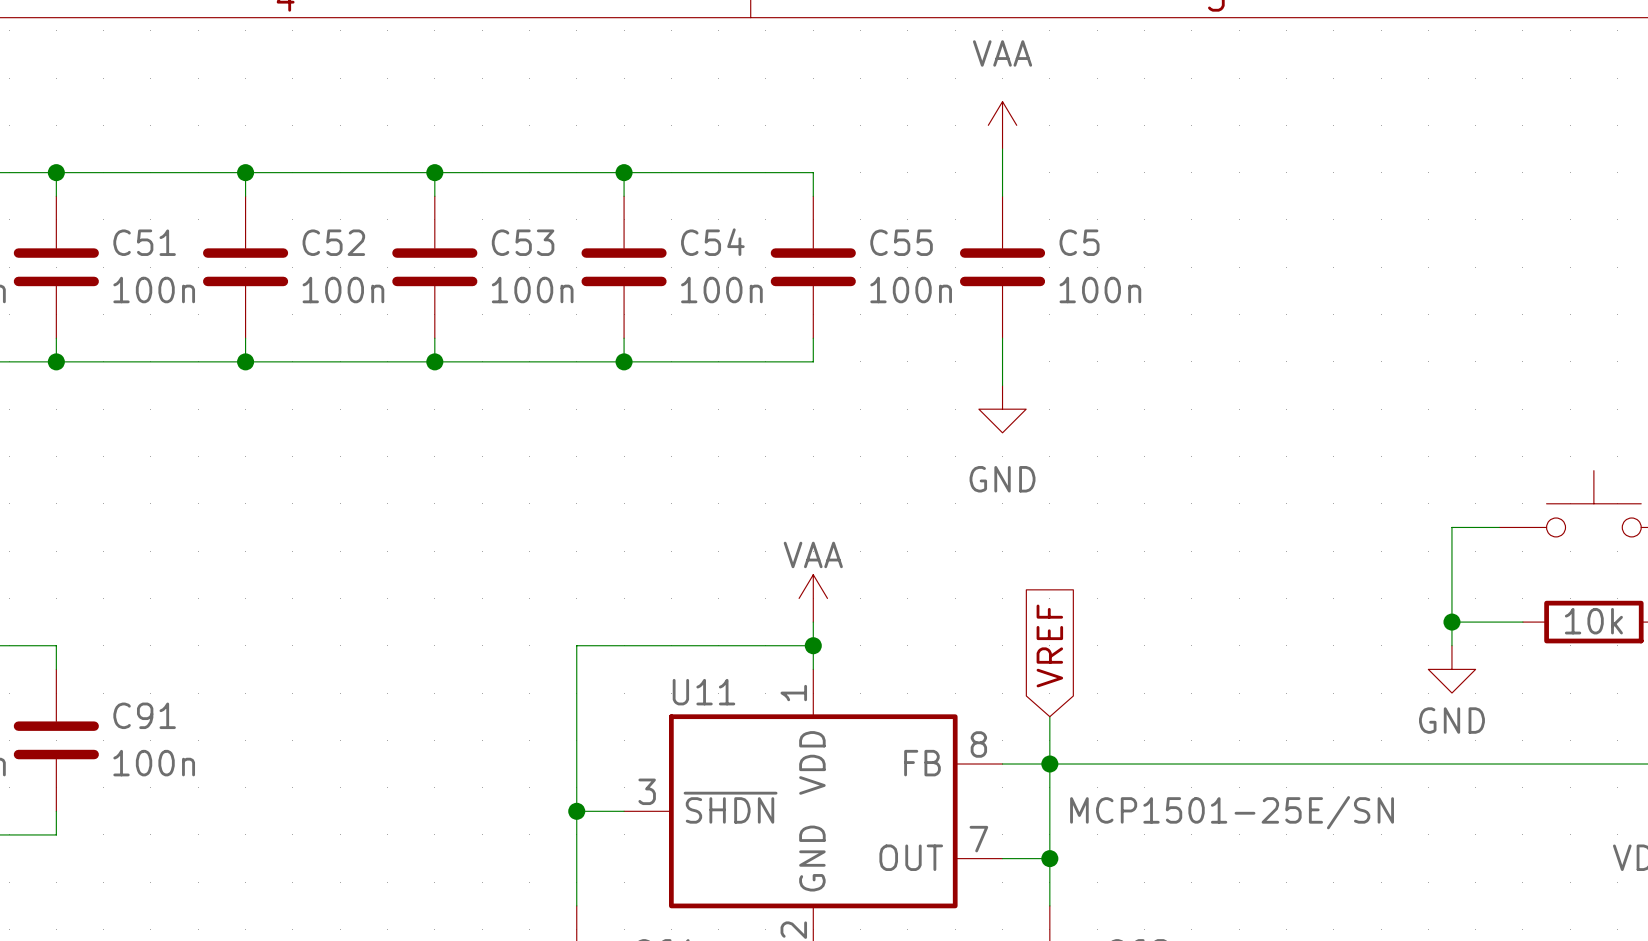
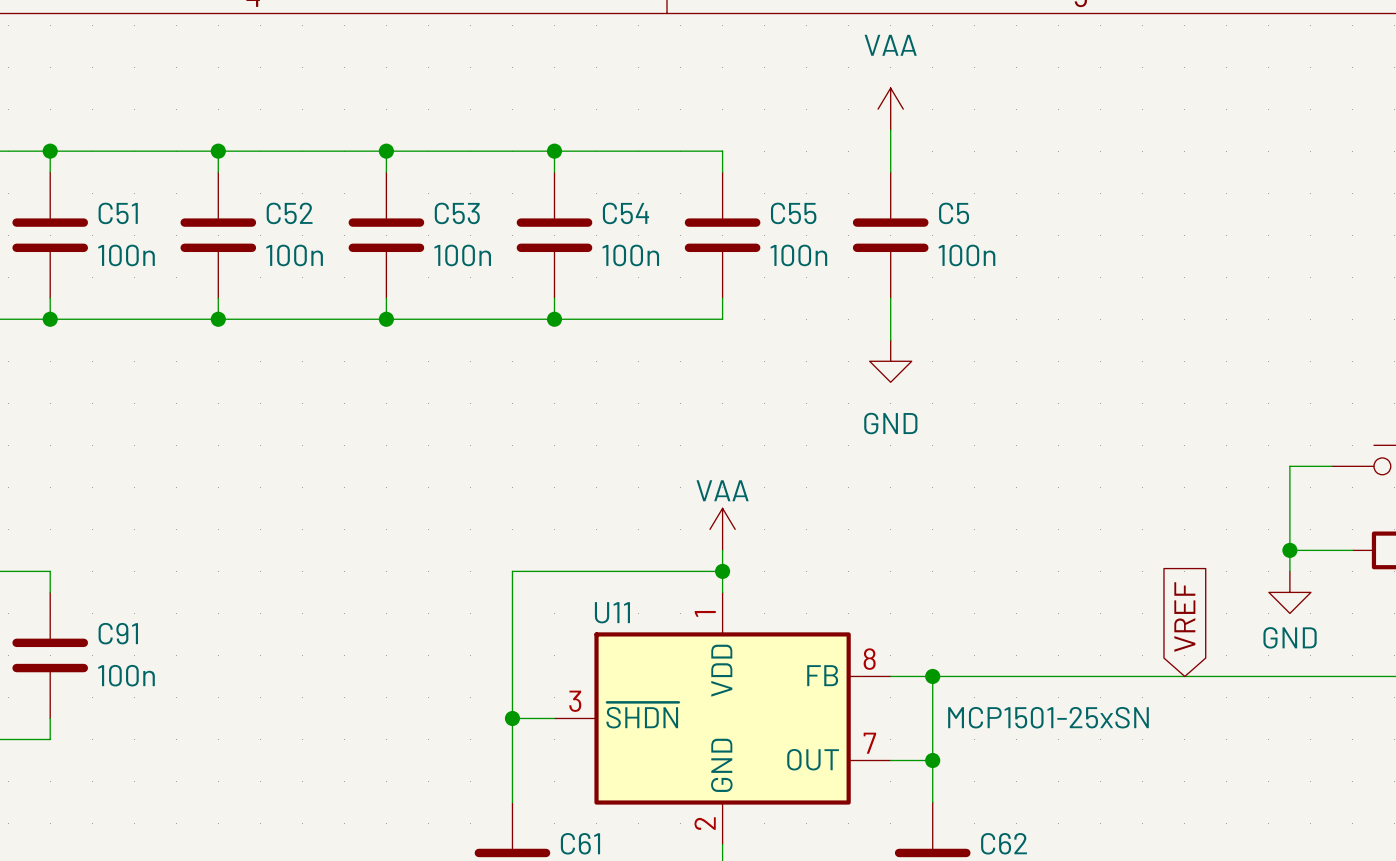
global label position: VREF (1049, 645) -> VREF (1184, 616)
wire: (1049, 716) (1049, 764) -> none
U11 value: MCP1501-25E/SN (1232, 812) -> MCP1501-25xSN (1048, 717)

